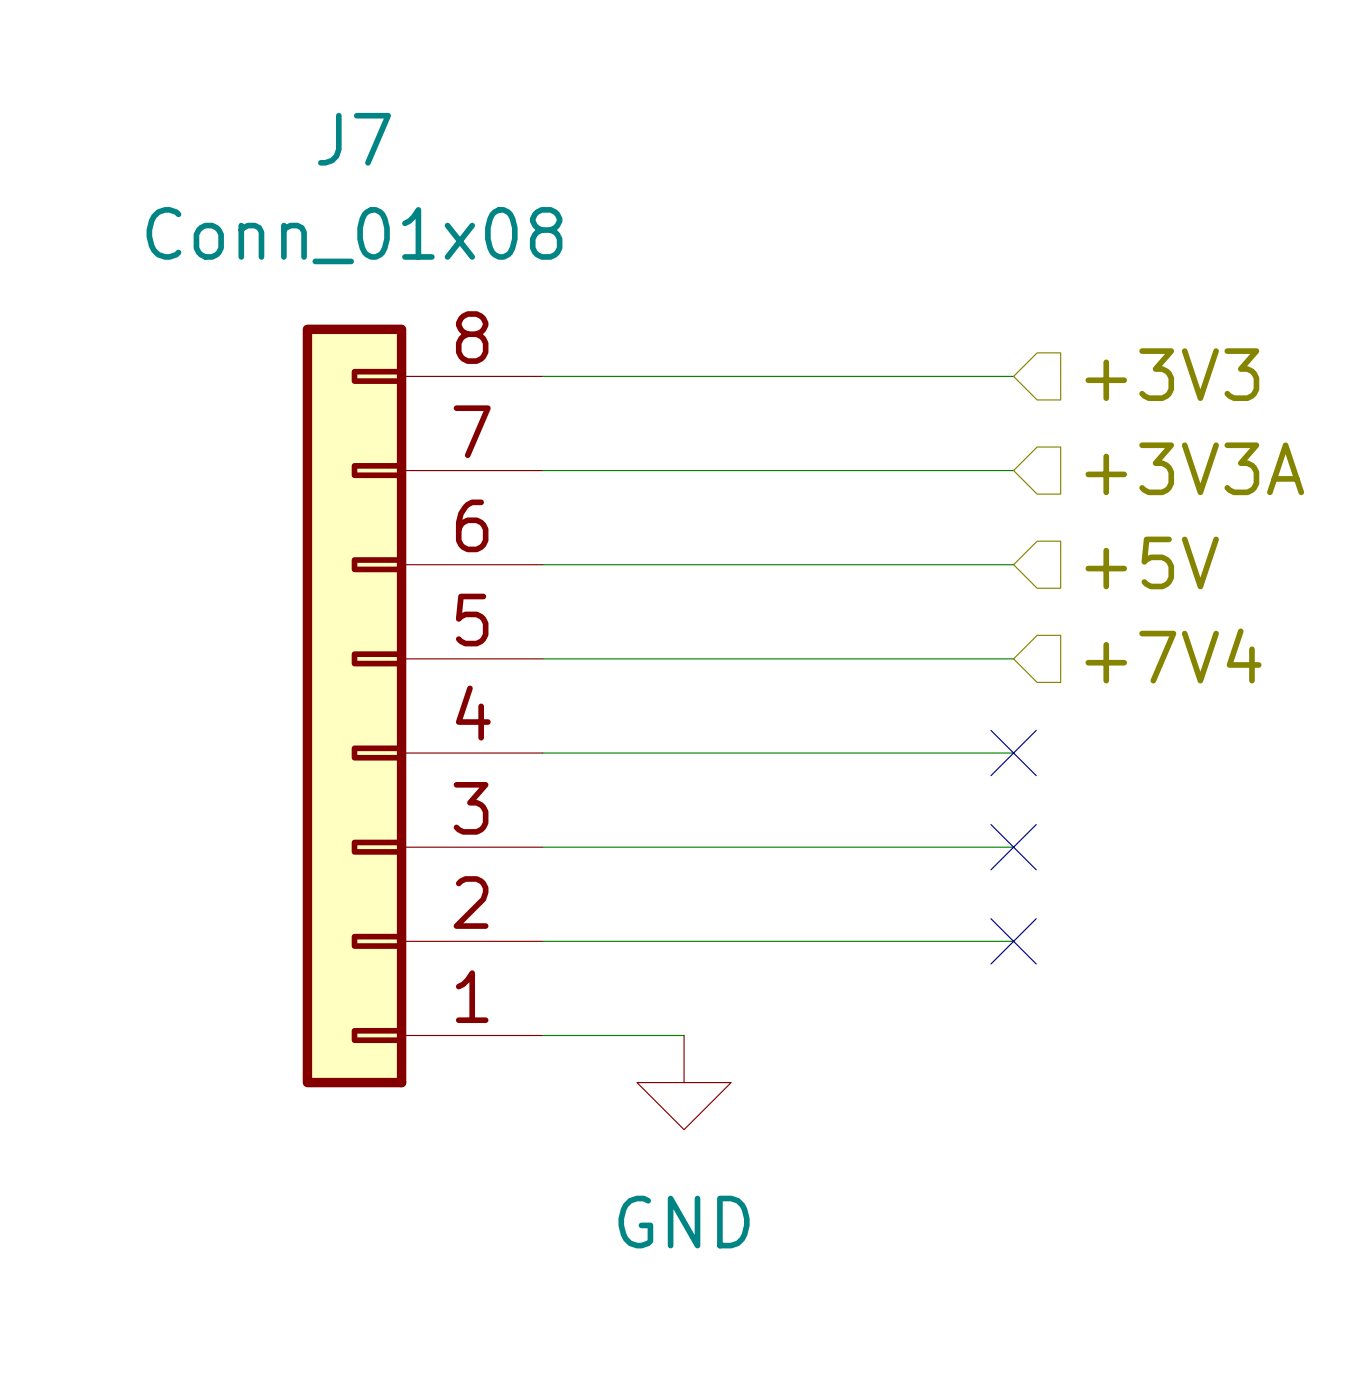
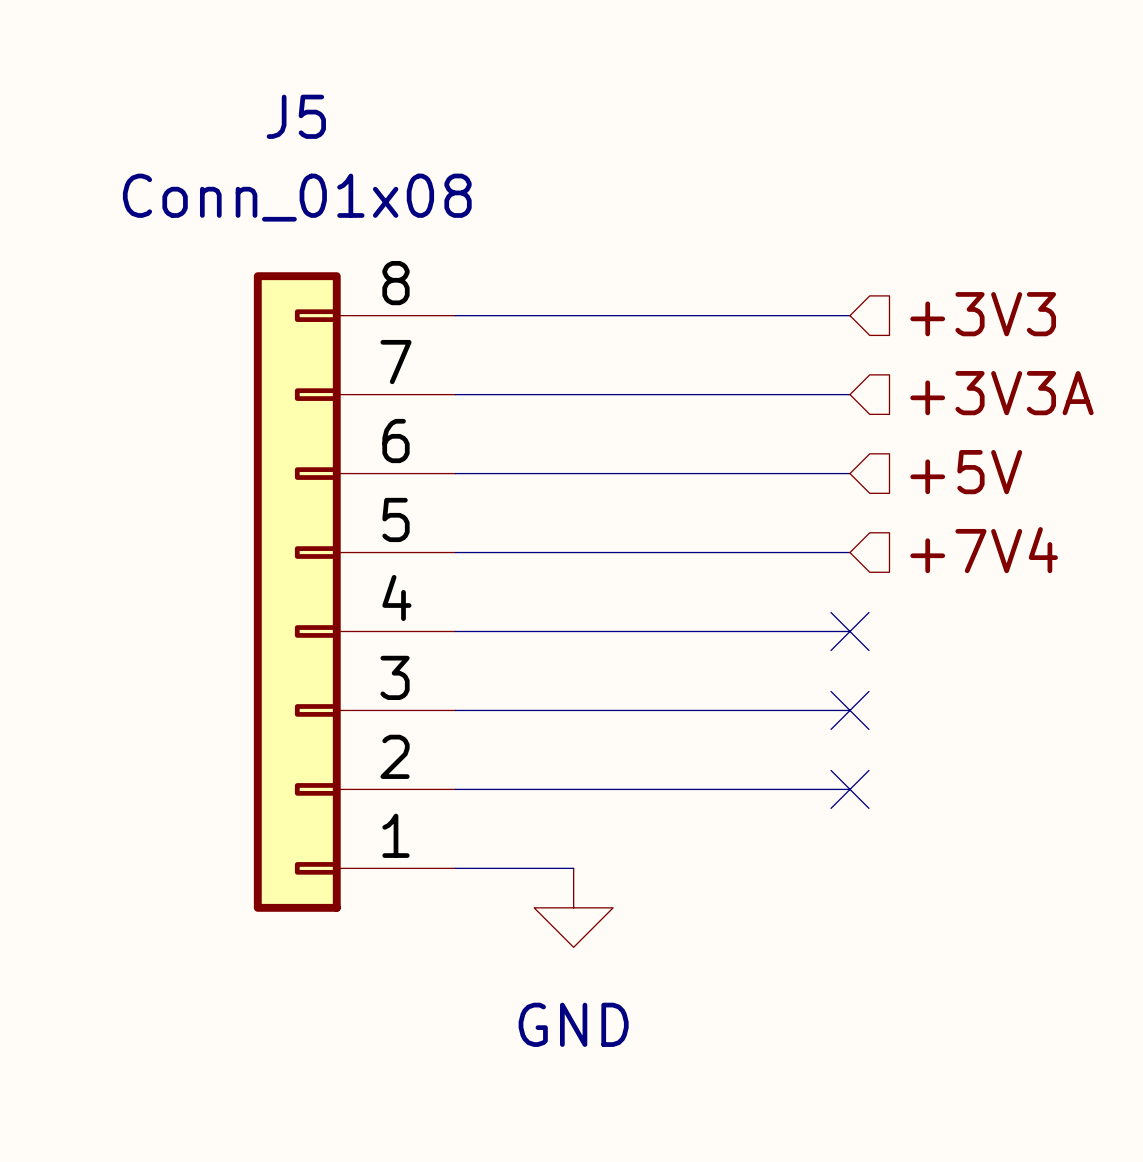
J7 name: J7 (354, 139) -> J5 (296, 116)

